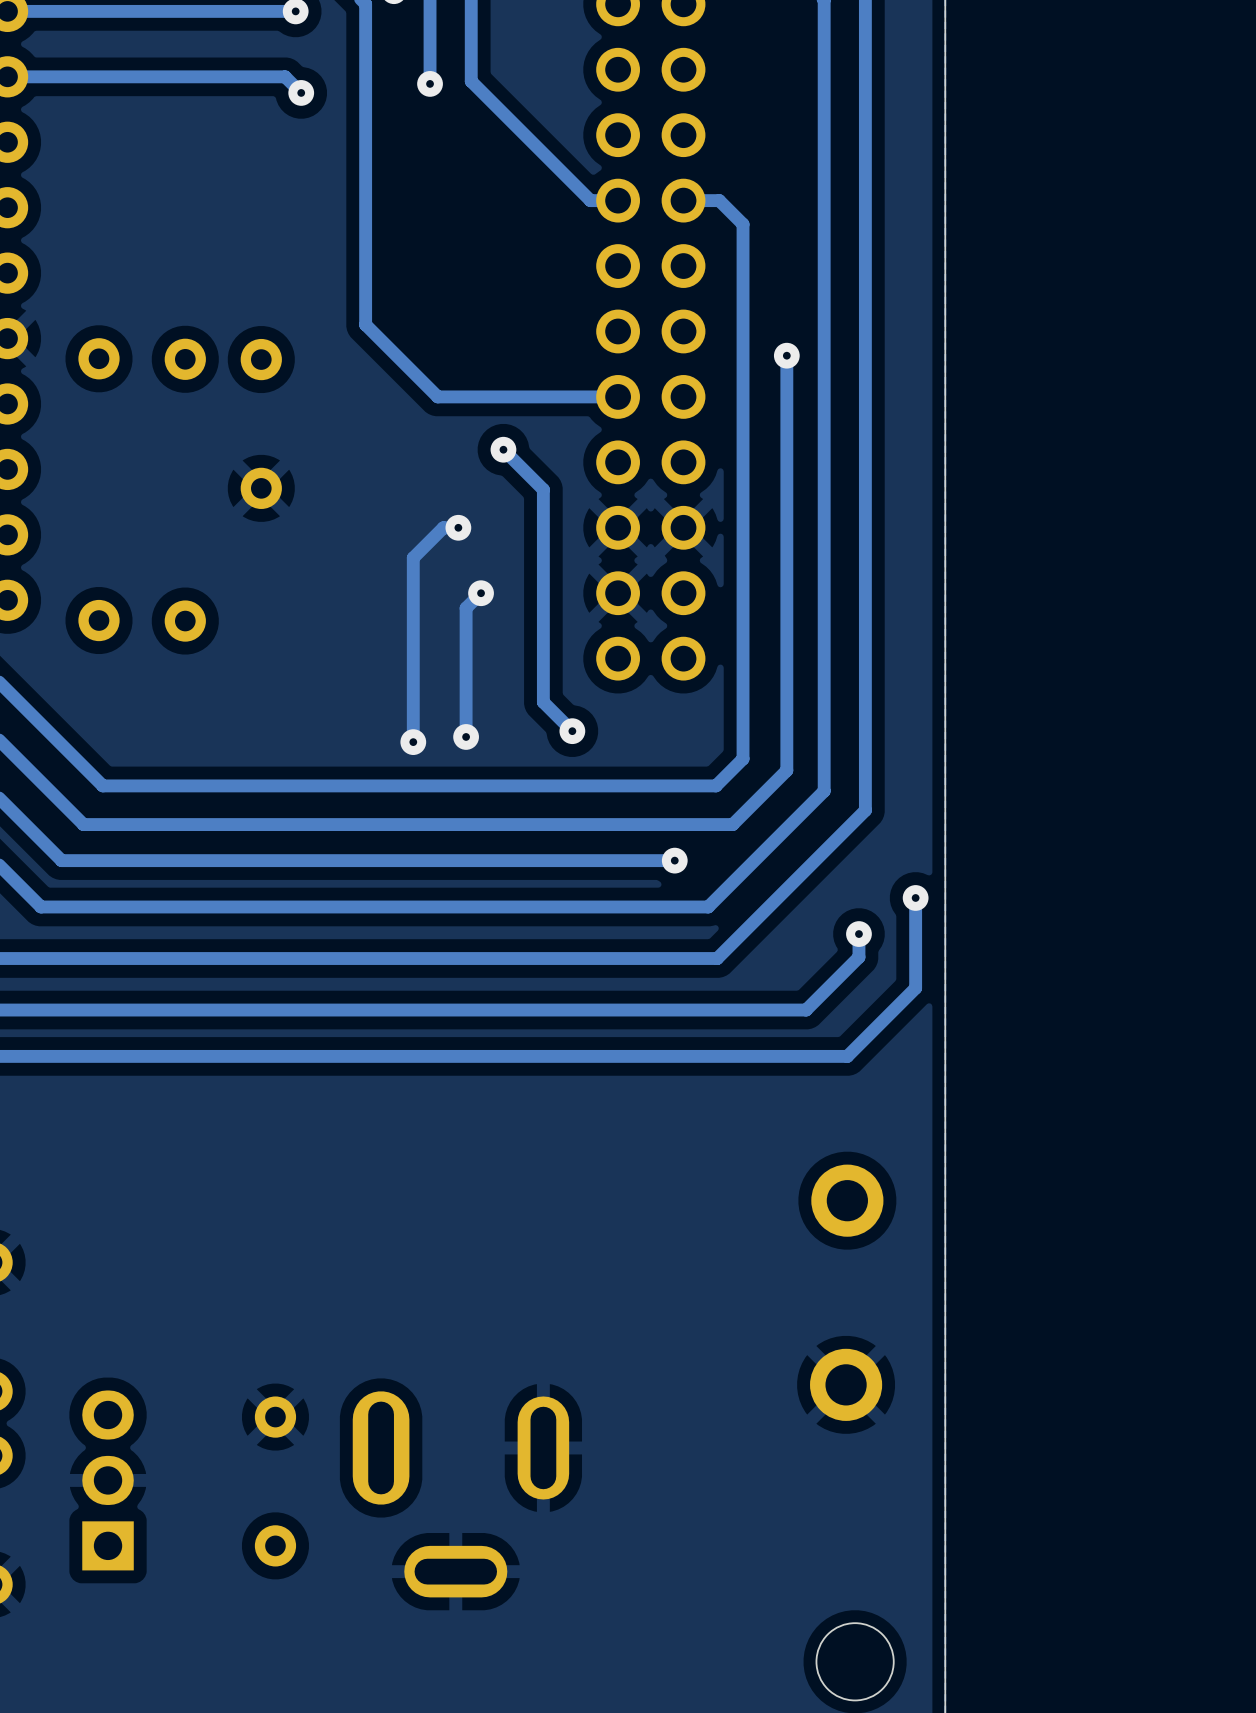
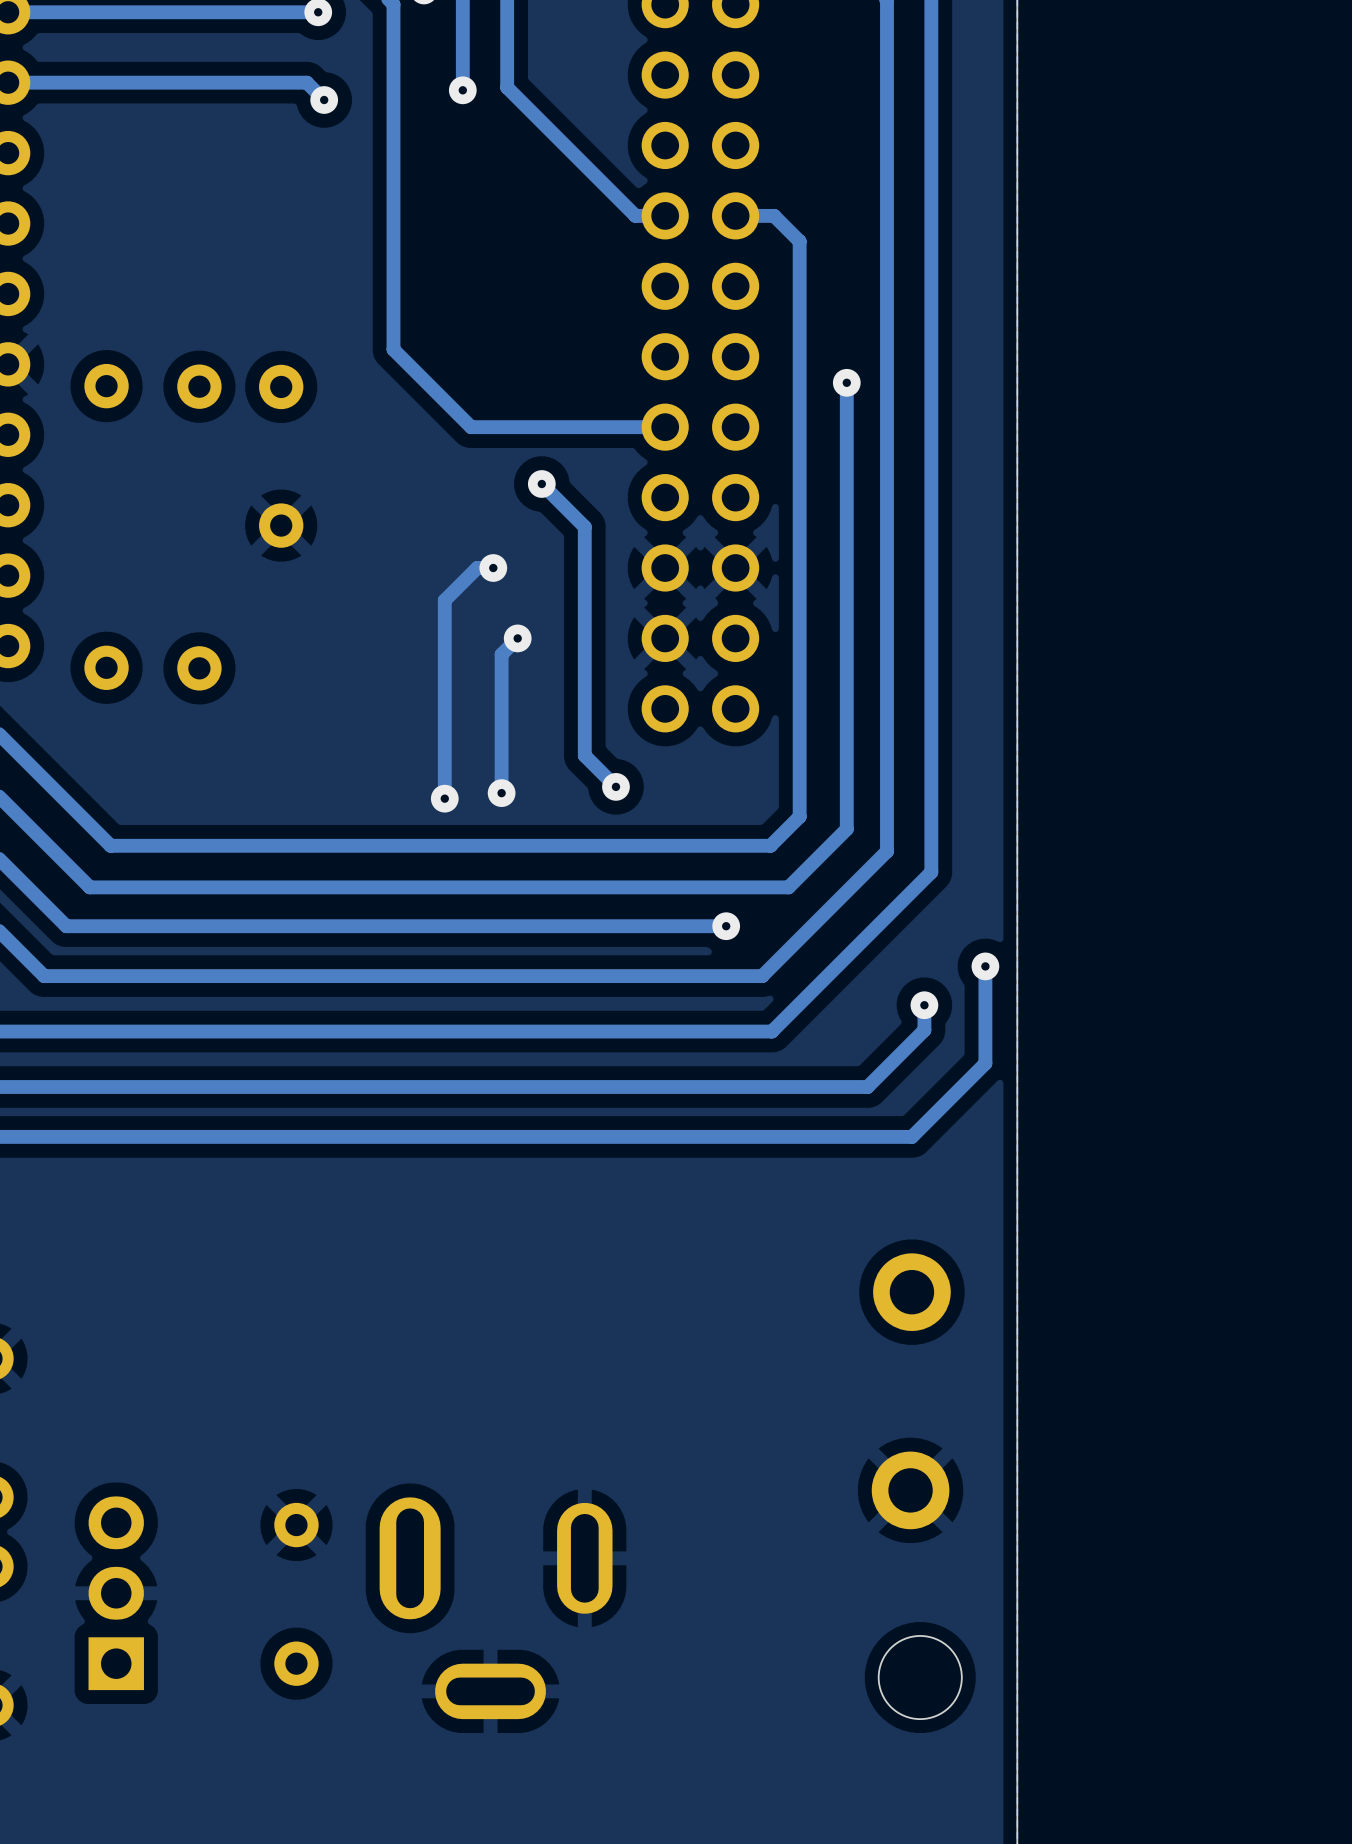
round board edge position: (855, 1661) -> (920, 1677)

